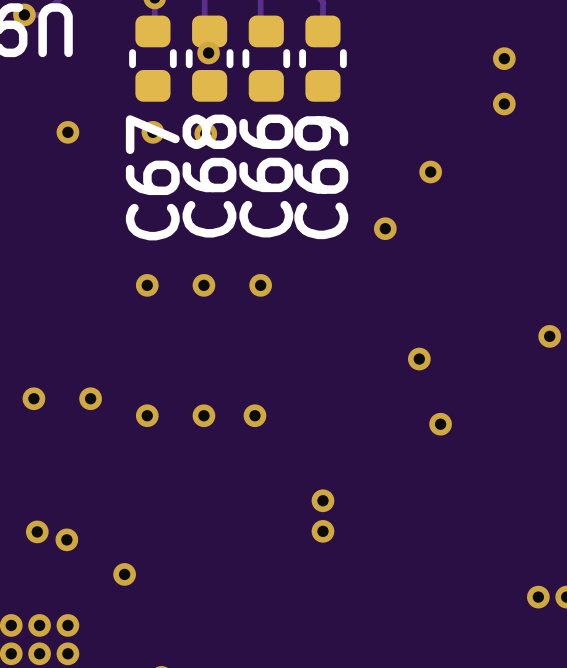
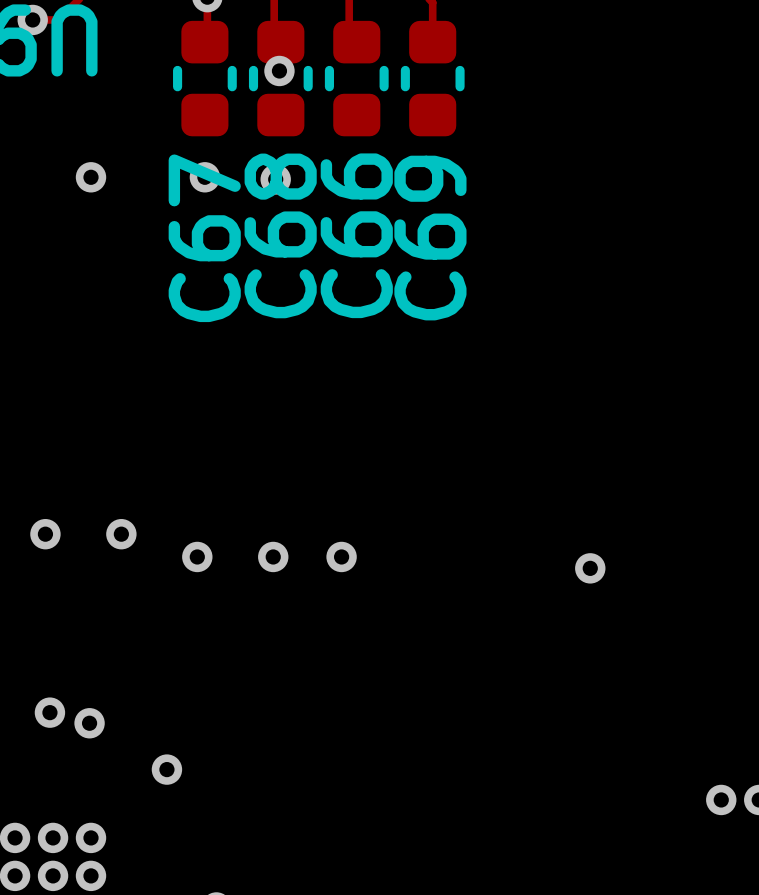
via: (504, 58) -> none
via: (504, 103) -> none
via: (430, 172) -> none
via: (385, 228) -> none
via: (147, 285) -> none
via: (203, 285) -> none
via: (260, 285) -> none
via: (549, 336) -> none
via: (419, 359) -> none
via: (322, 500) -> none
via: (322, 531) -> none

